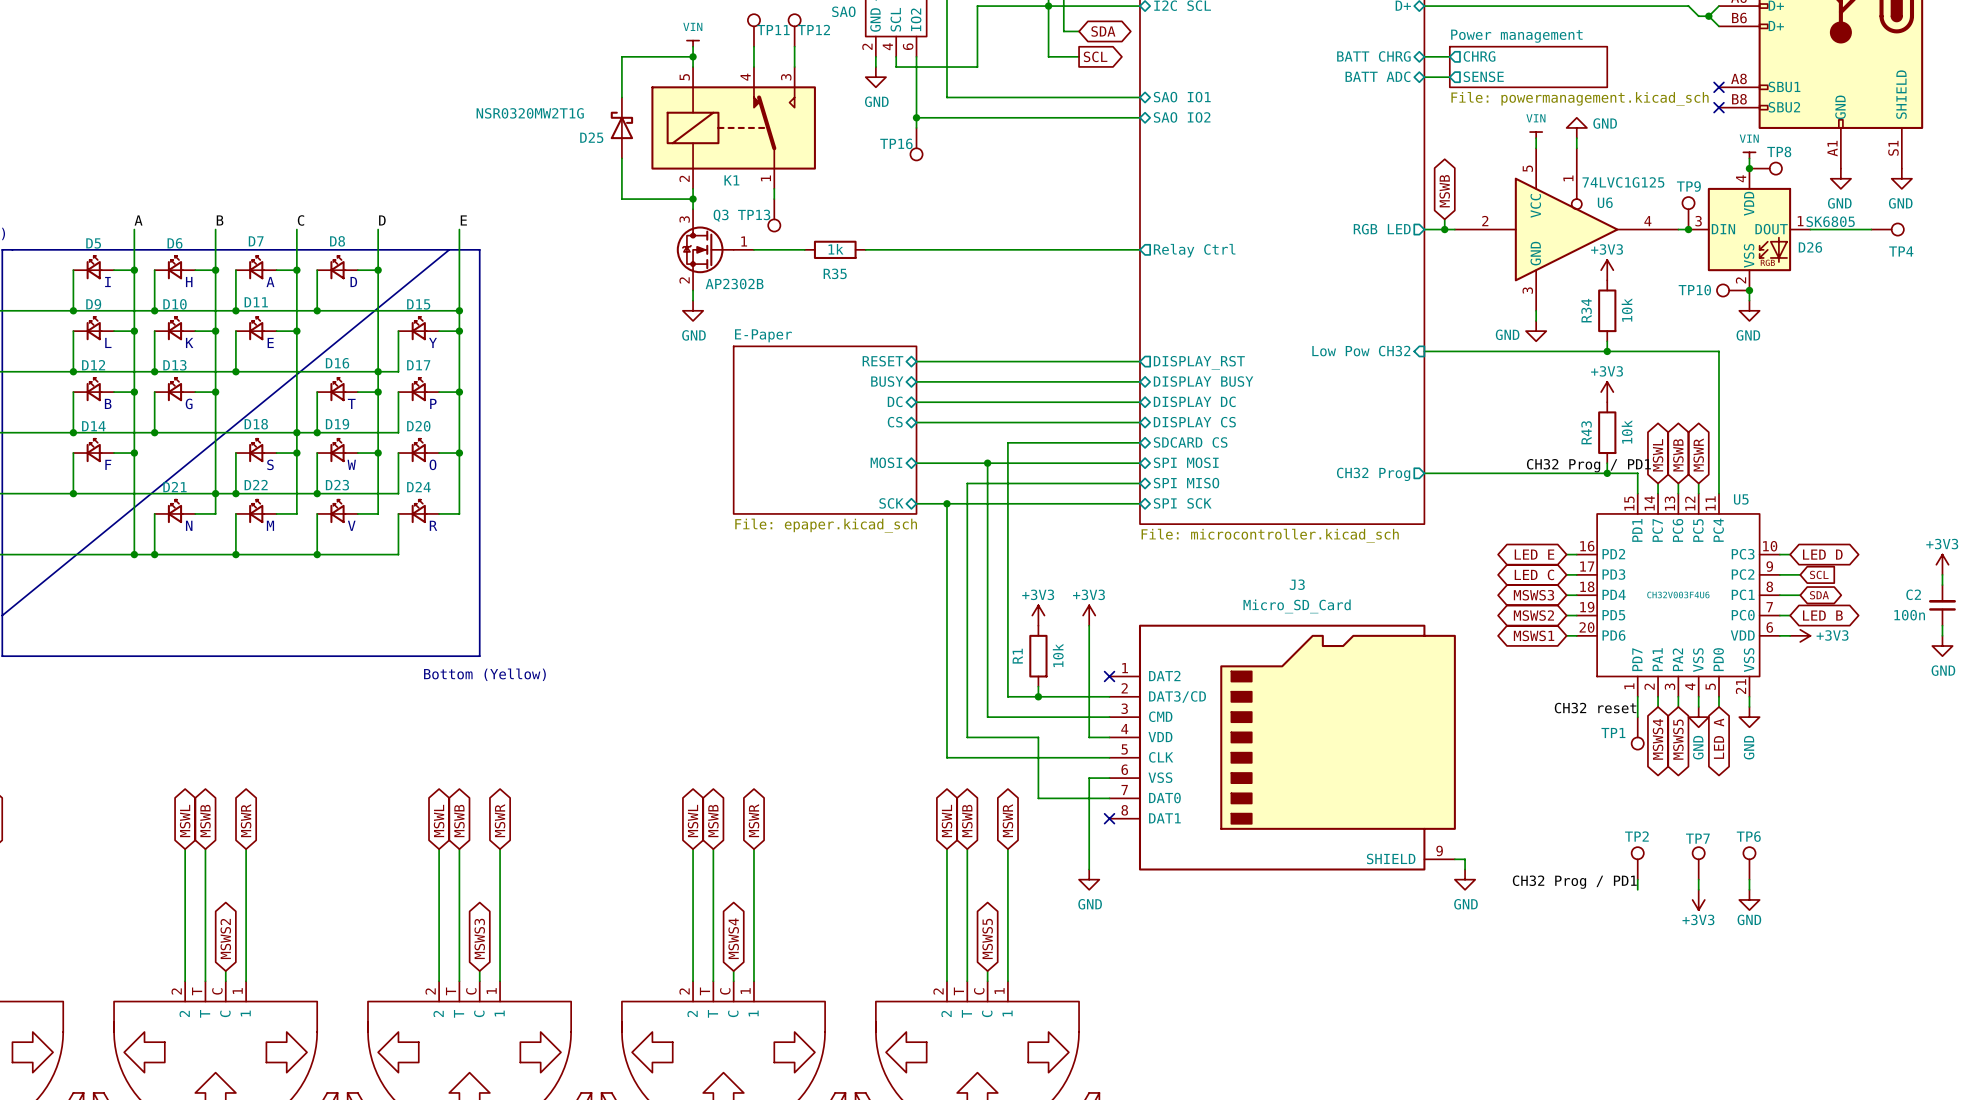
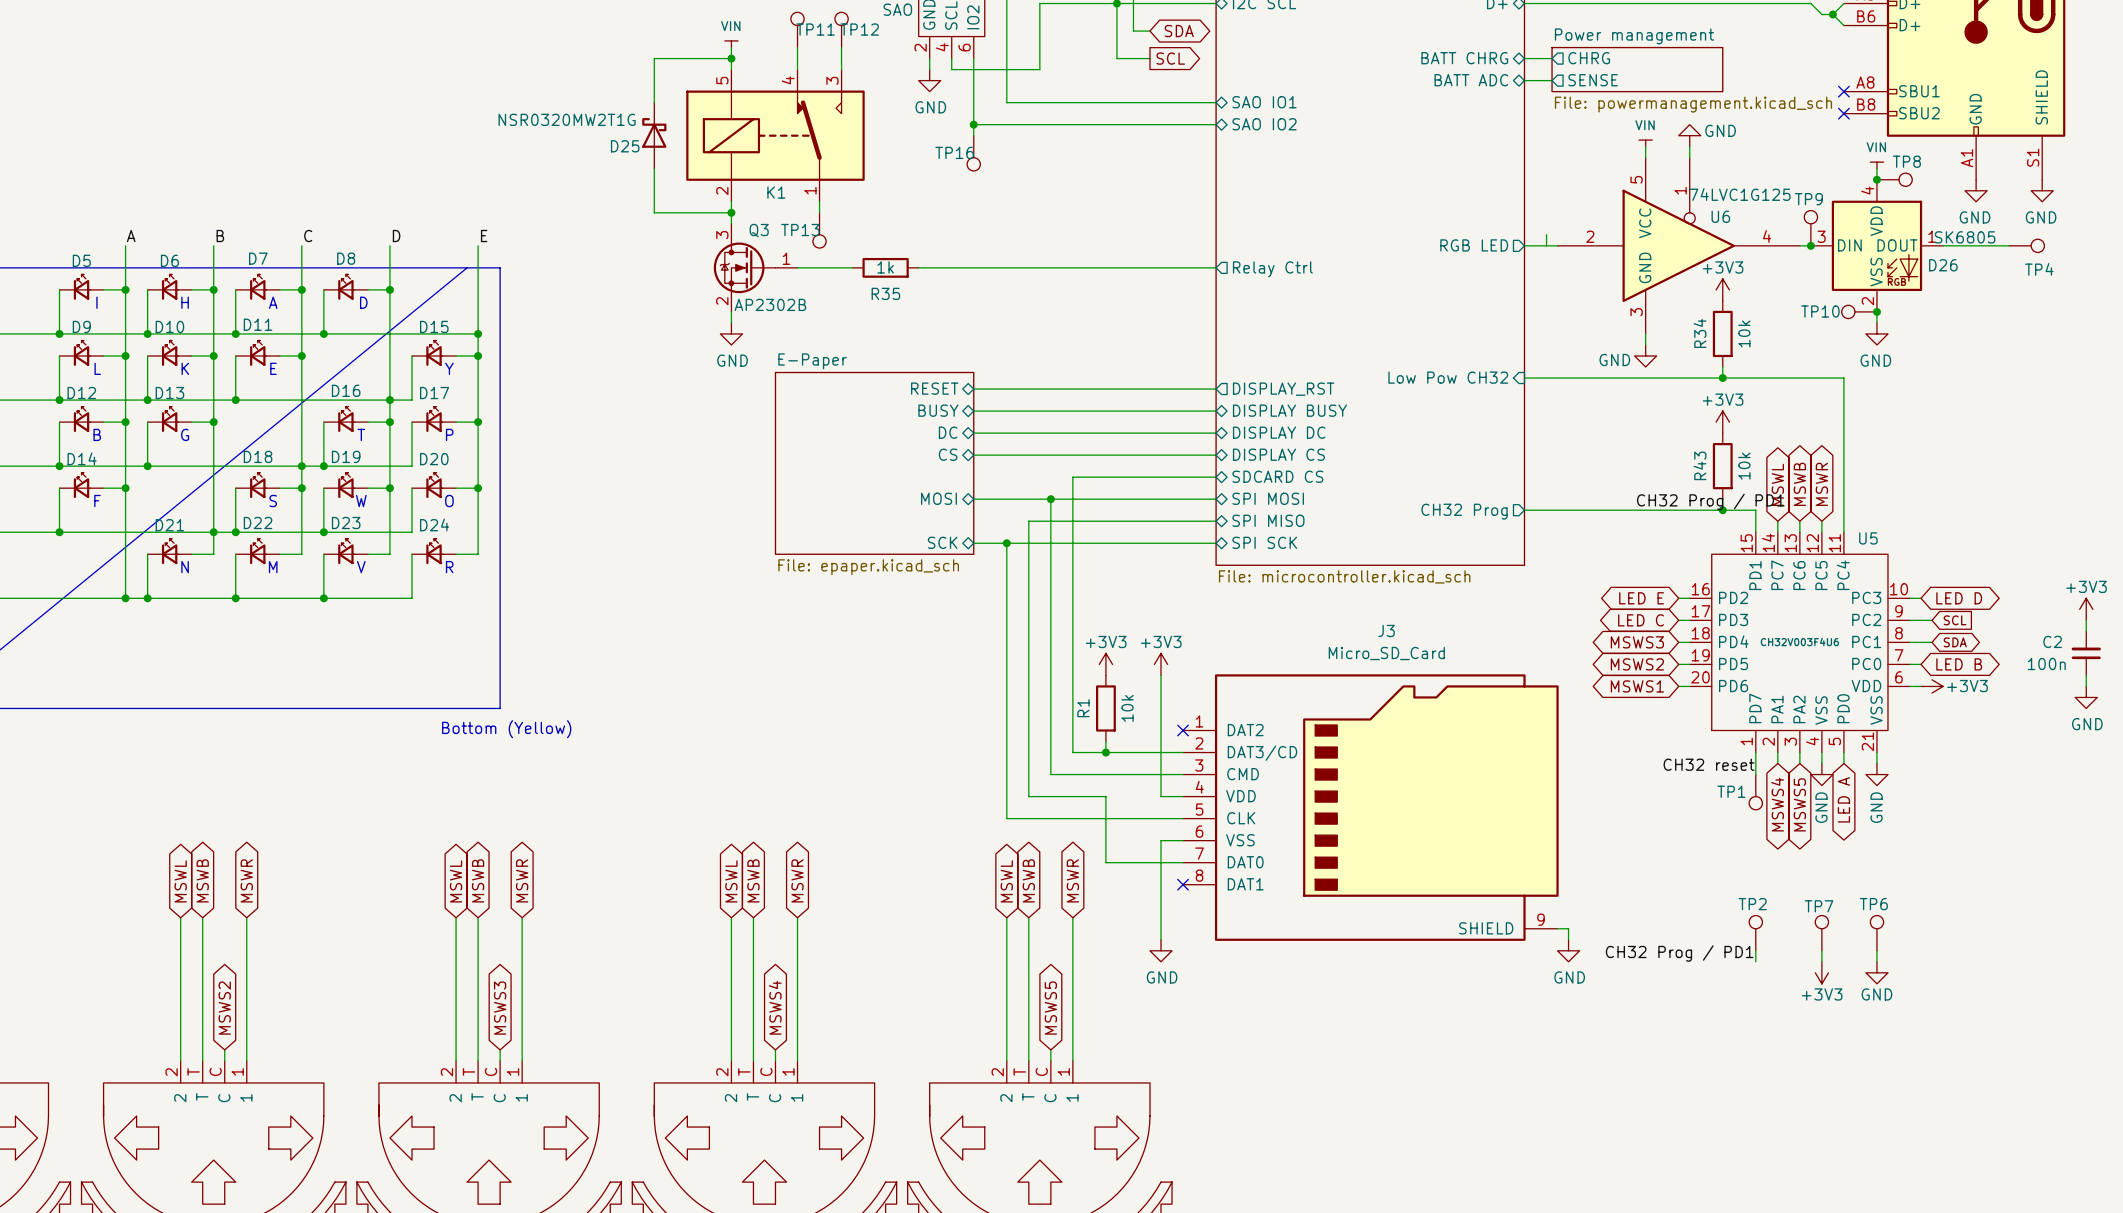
global label: MSWB (1444, 191) -> none
junction: (1444, 229) -> none

